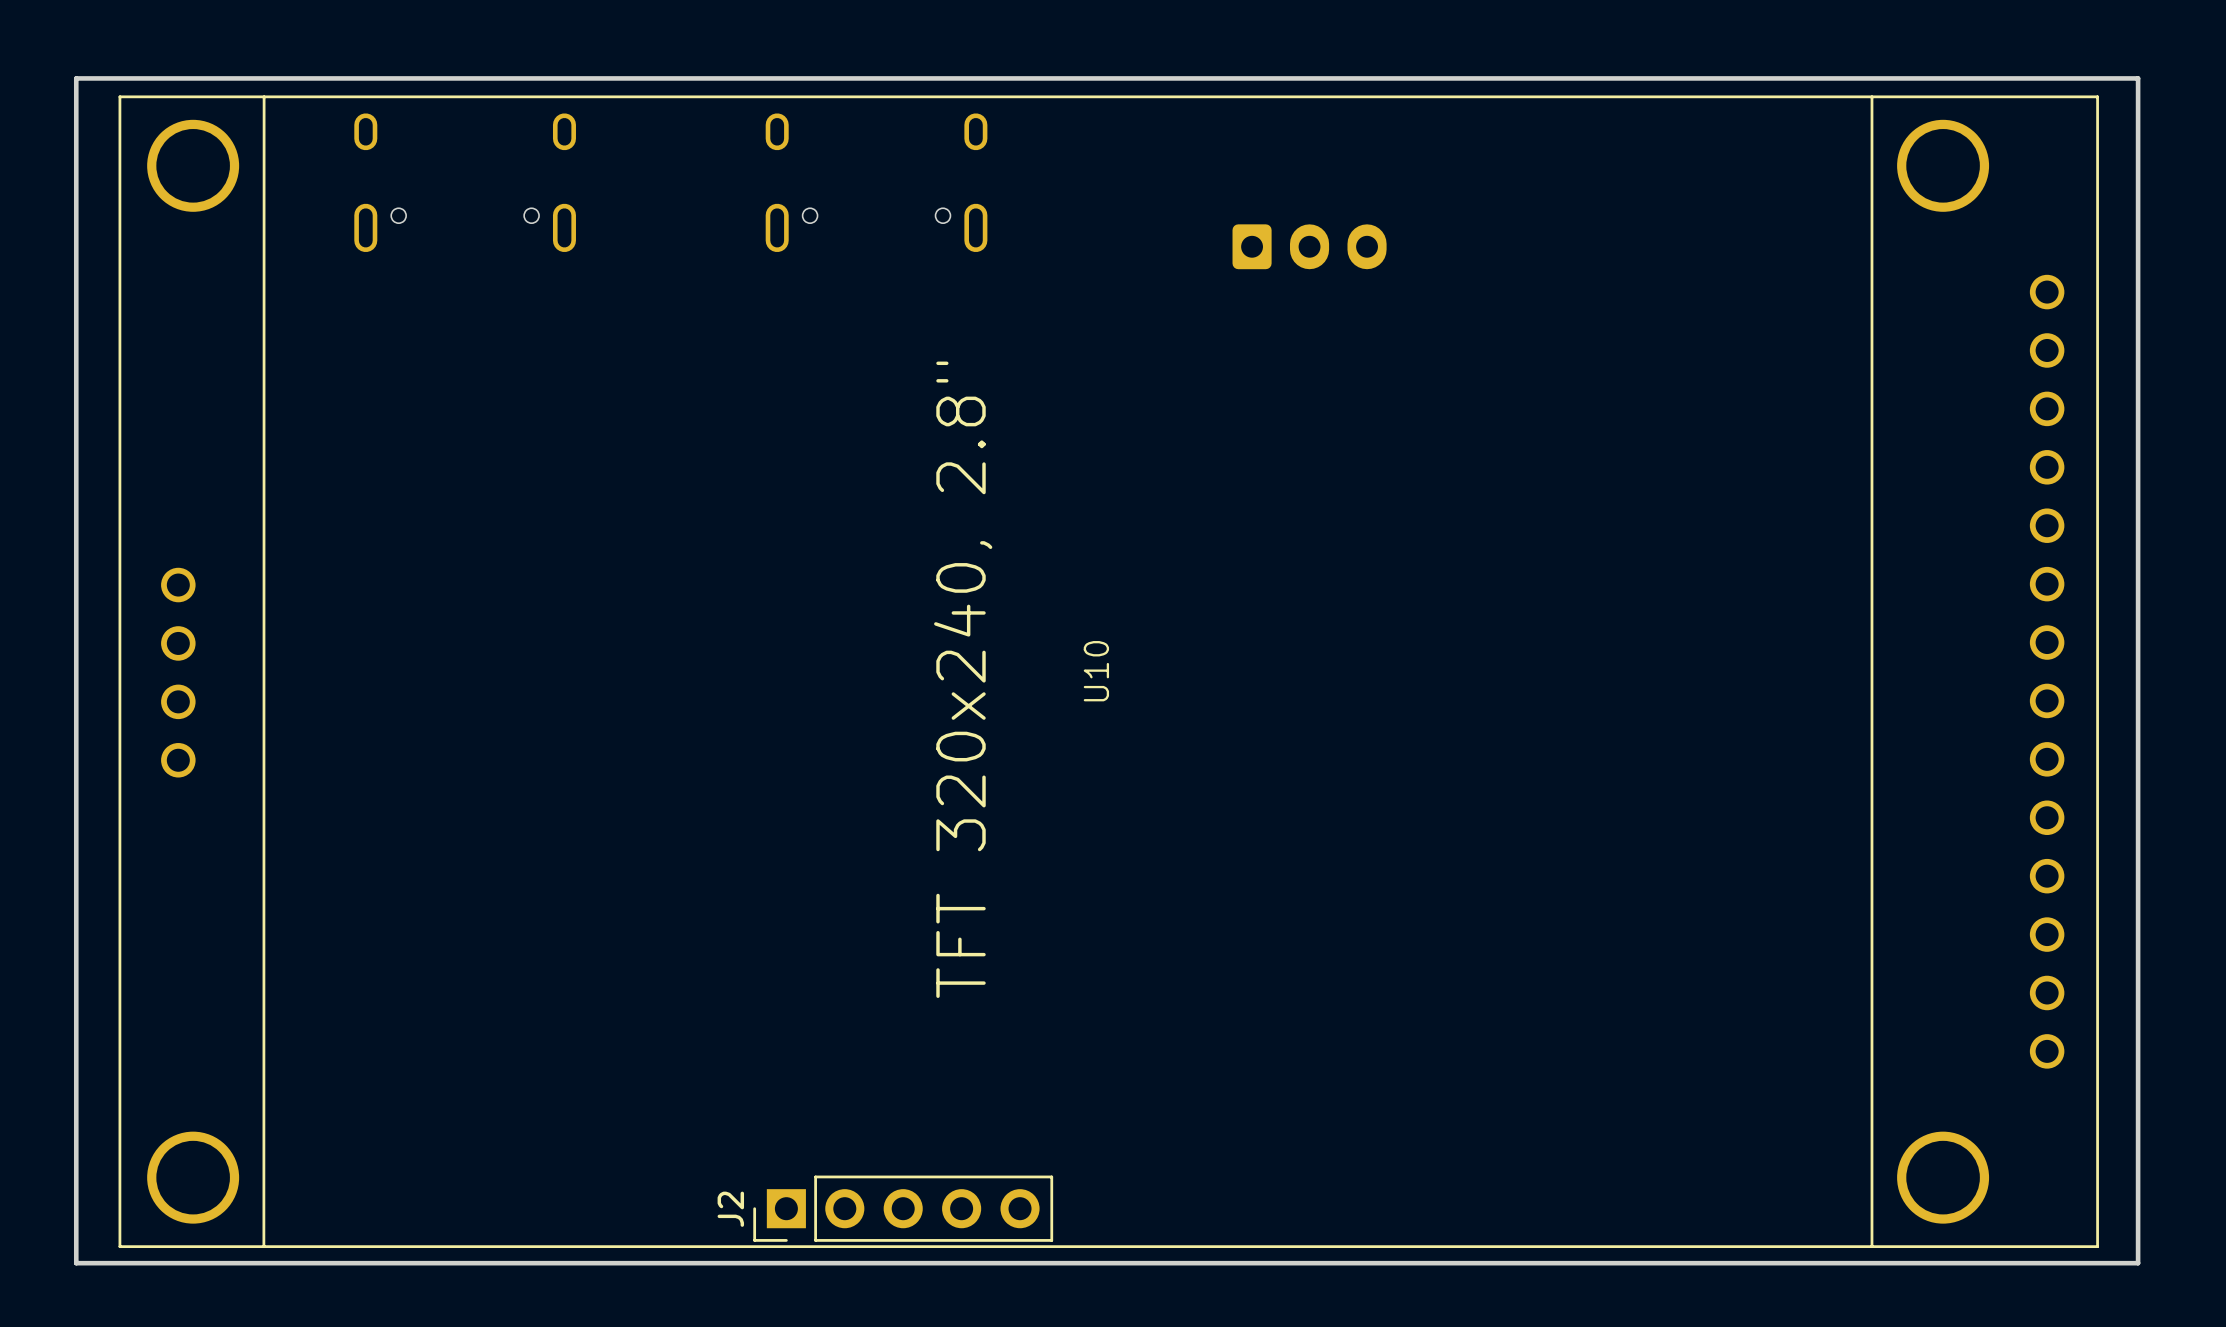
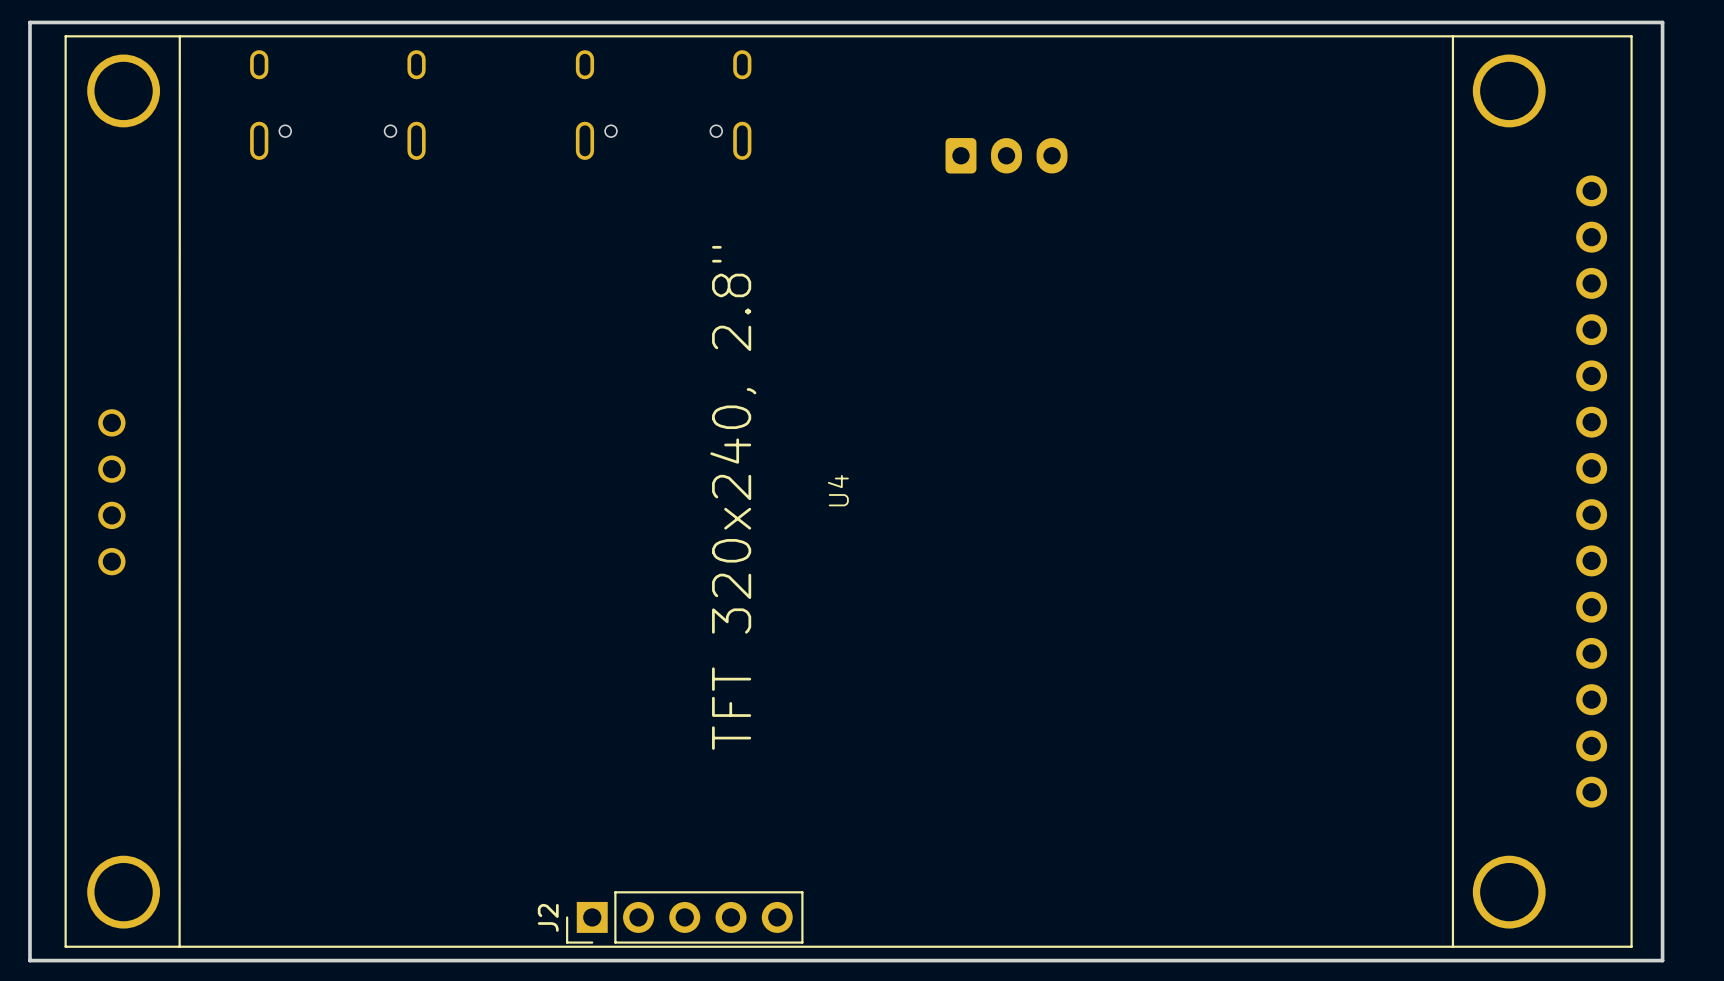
U4: none -> (848, 491)
U10: (1108, 671) -> none

